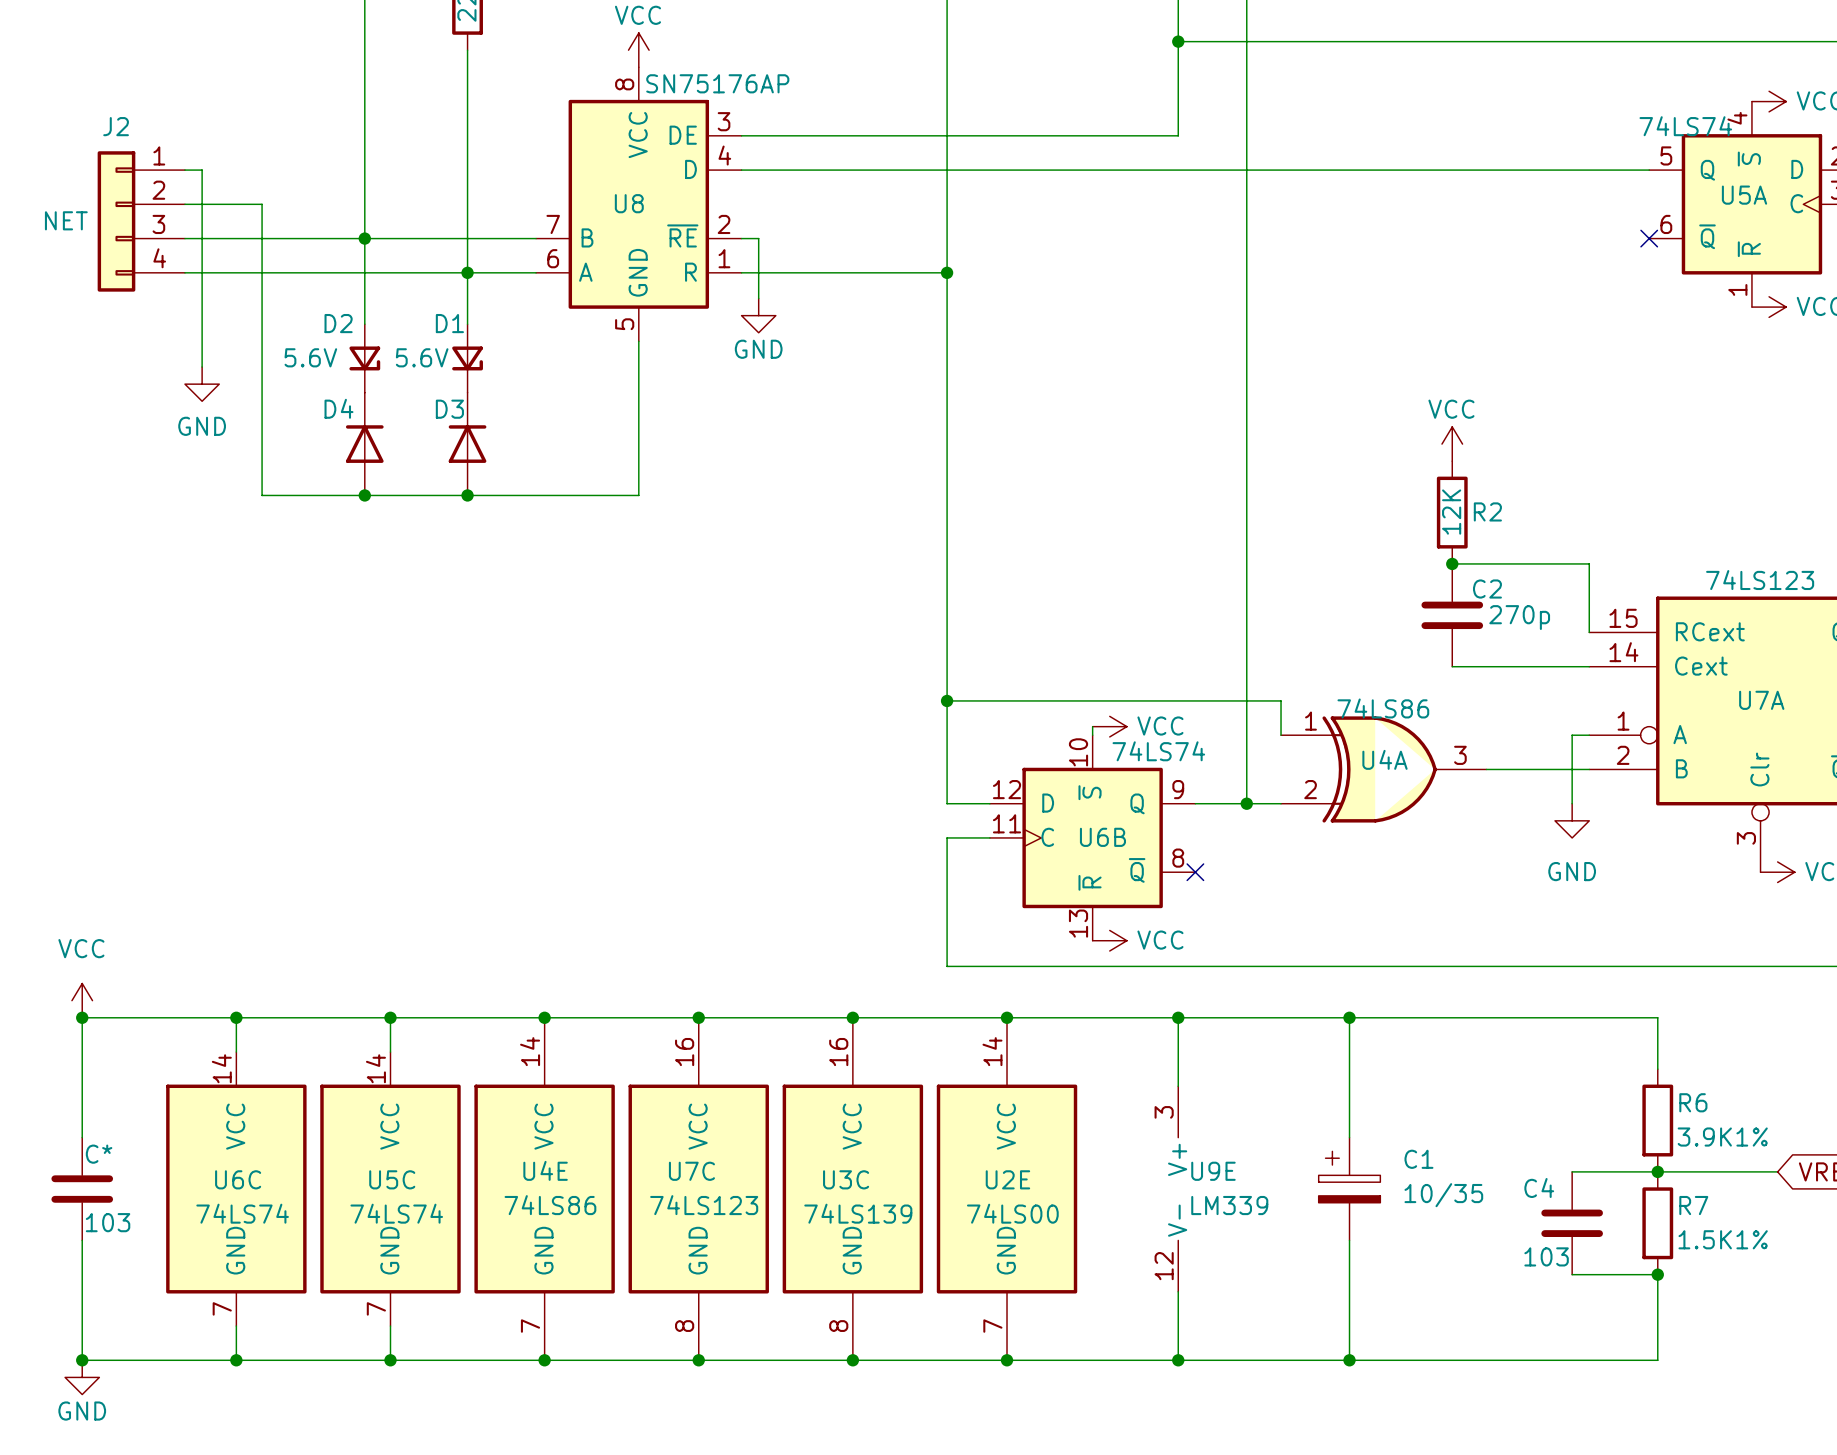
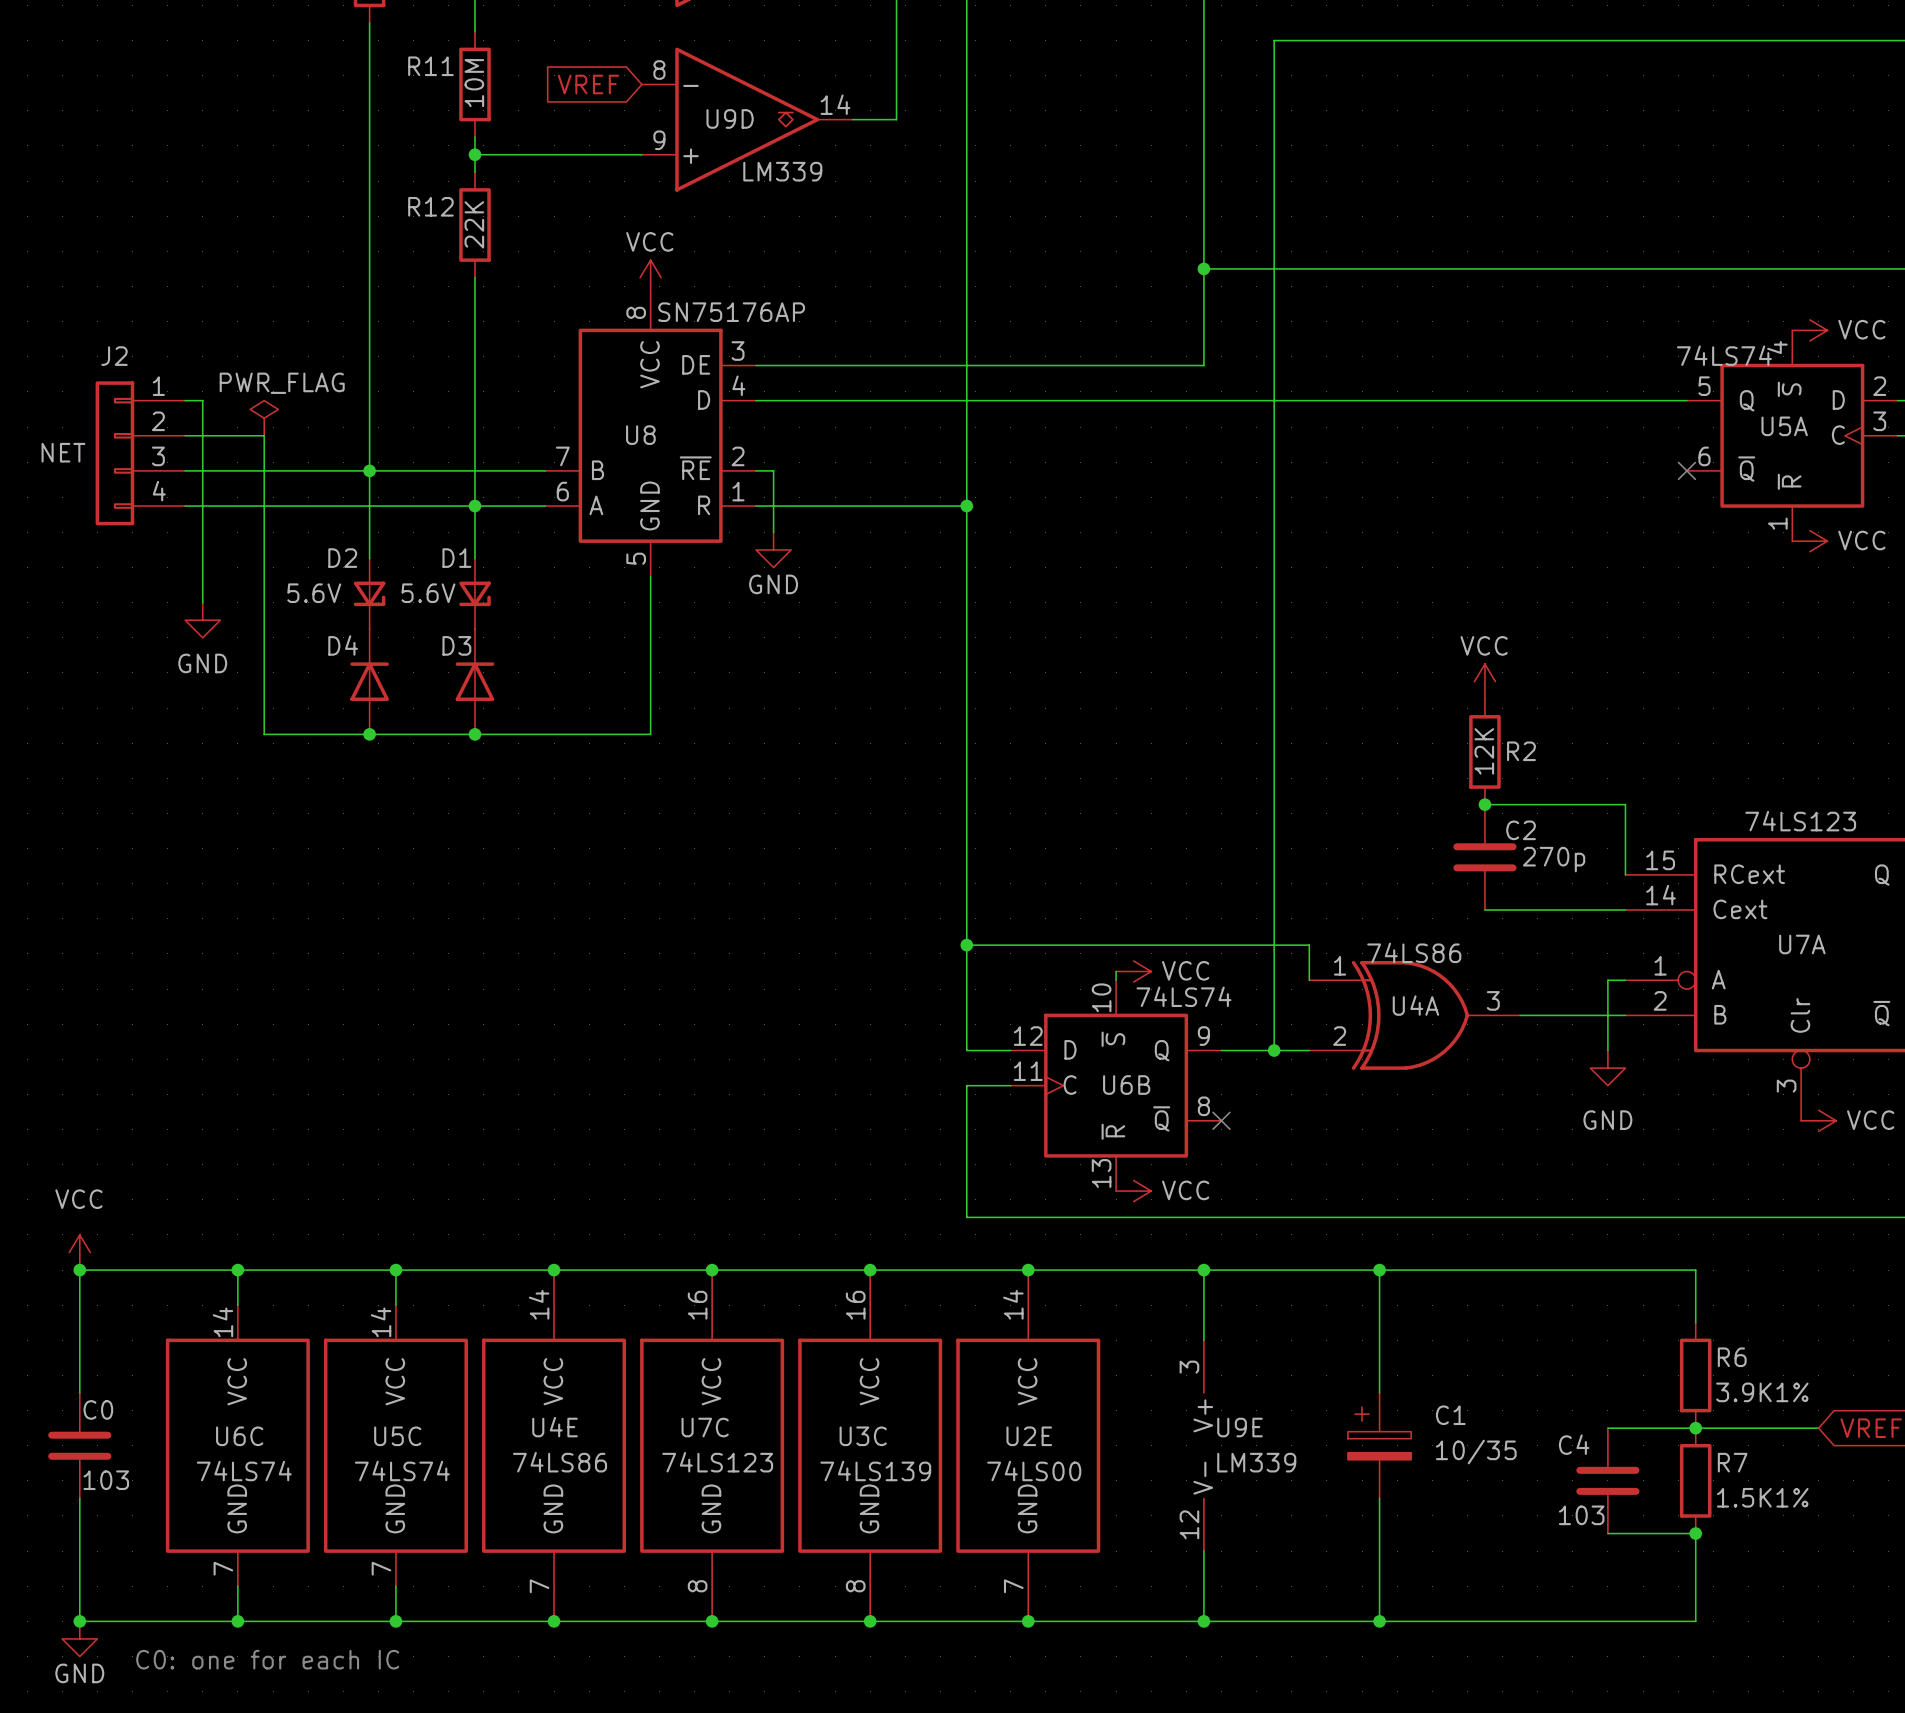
power symbol: none -> PWR_FLAG (264, 418)
C* name: C* (99, 1154) -> C0 (98, 1409)
text: none -> C0: one for each IC (267, 1659)

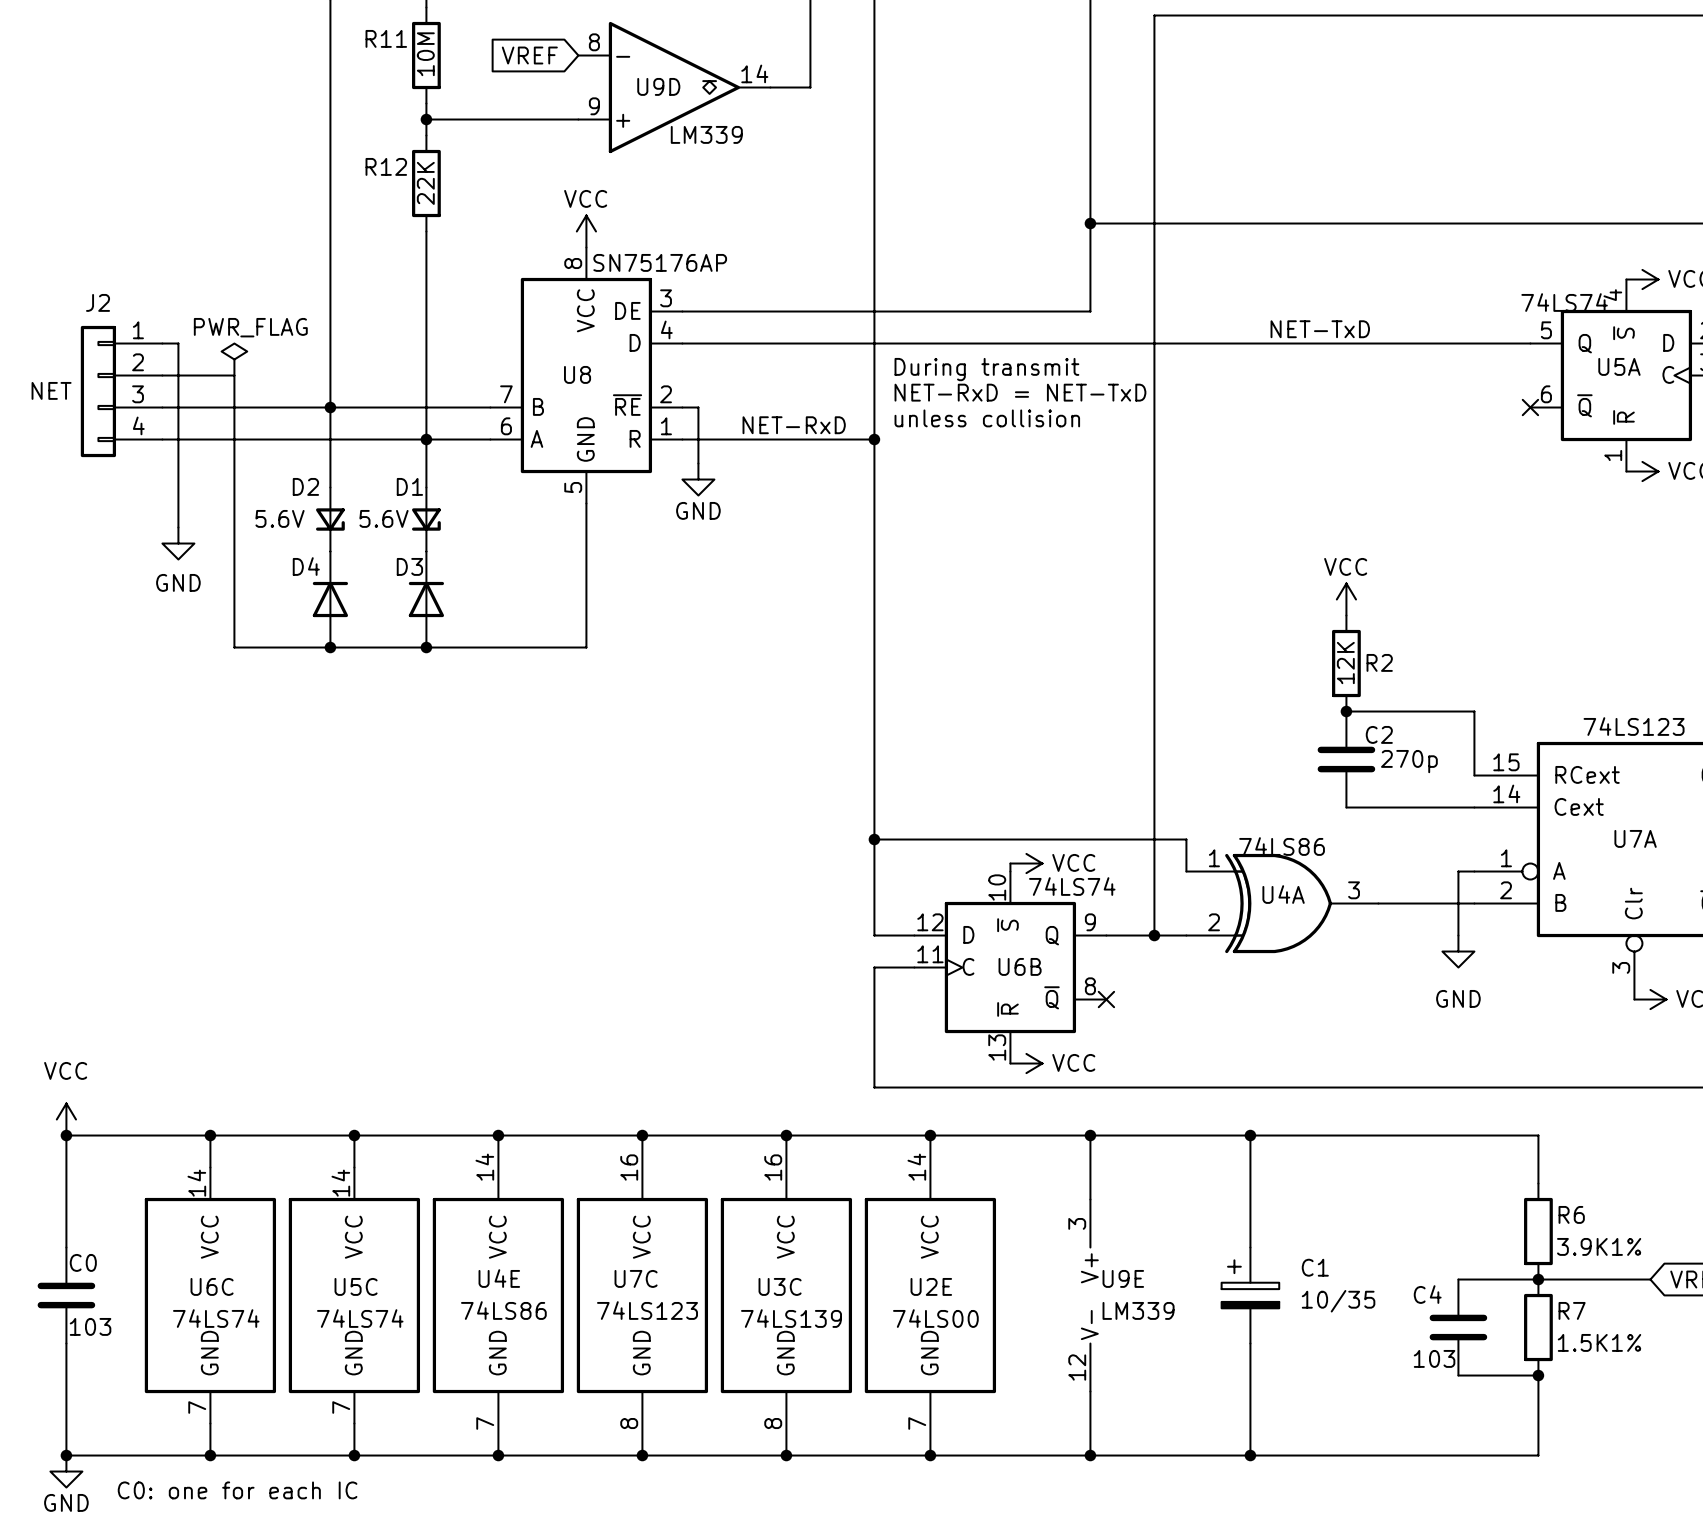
label: none -> NET-TxD (1320, 329)
text: none -> During transmit (986, 369)
text: none -> NET-RxD = NET-TxD (1020, 392)
text: none -> unless collision (987, 418)
label: none -> NET-RxD (794, 425)

